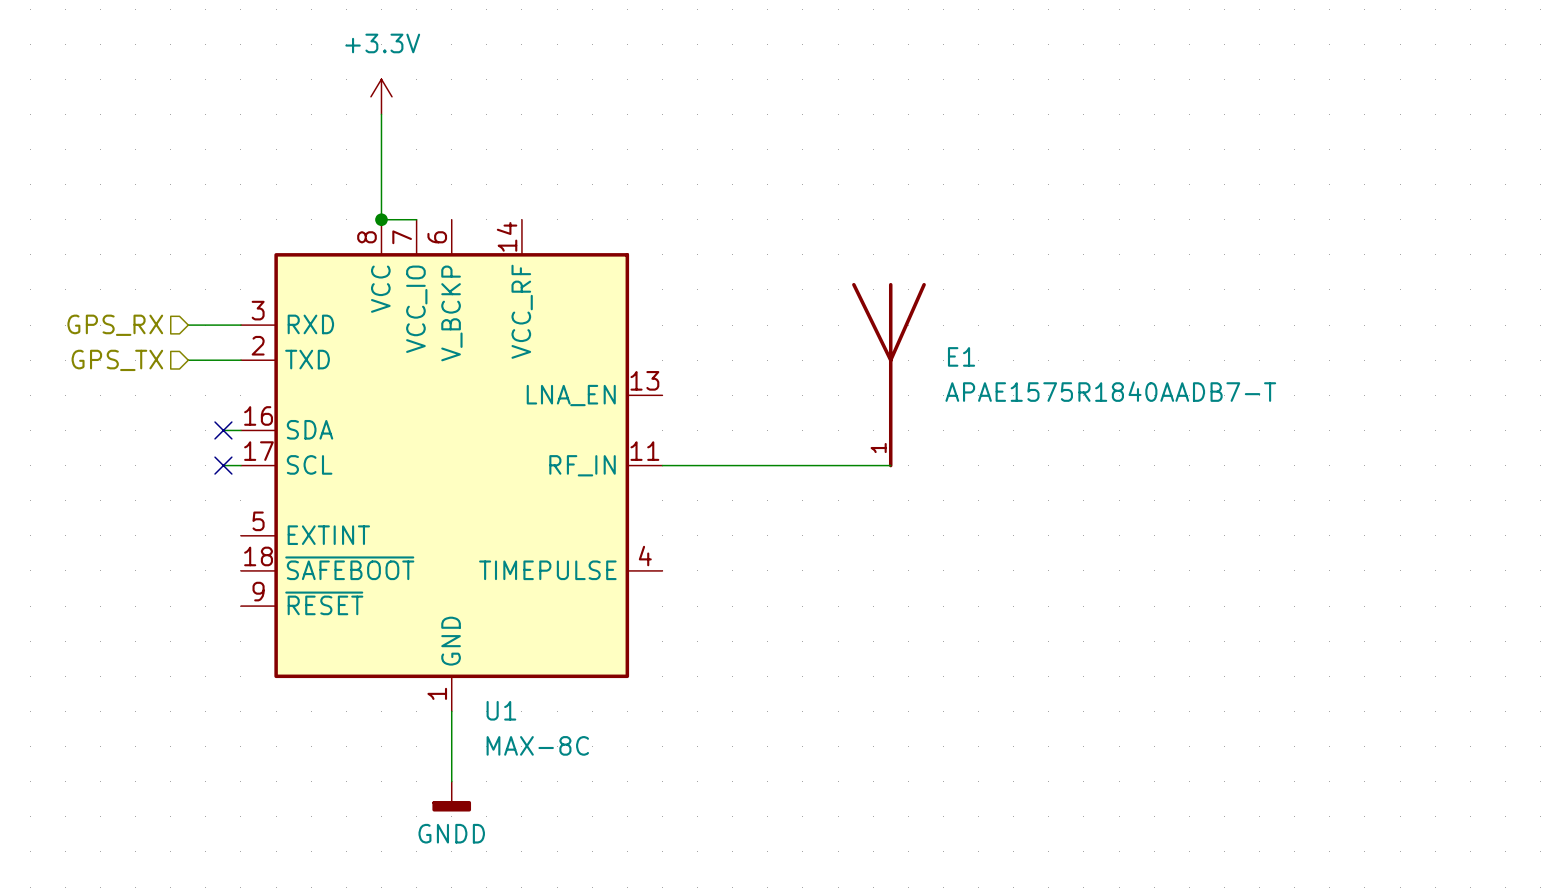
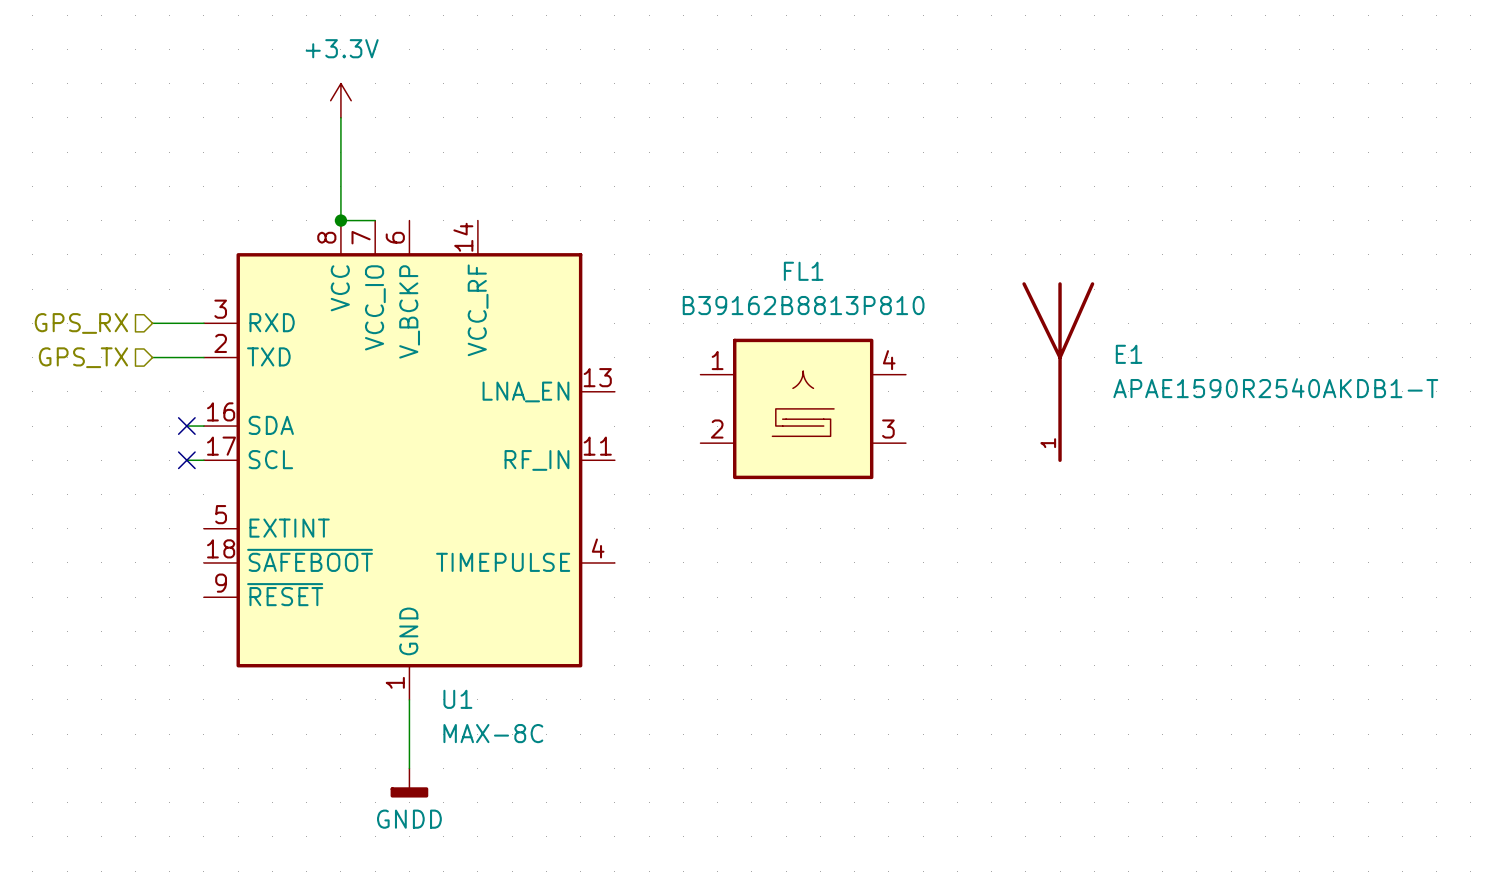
E1 position: (888, 375) -> (1058, 372)
E1 value: APAE1575R1840AADB7-T (1110, 391) -> APAE1590R2540AKDB1-T (1275, 388)
FL1: none -> B39162B8813P810 (803, 408)
wire: (662, 465) (890, 465) -> none

